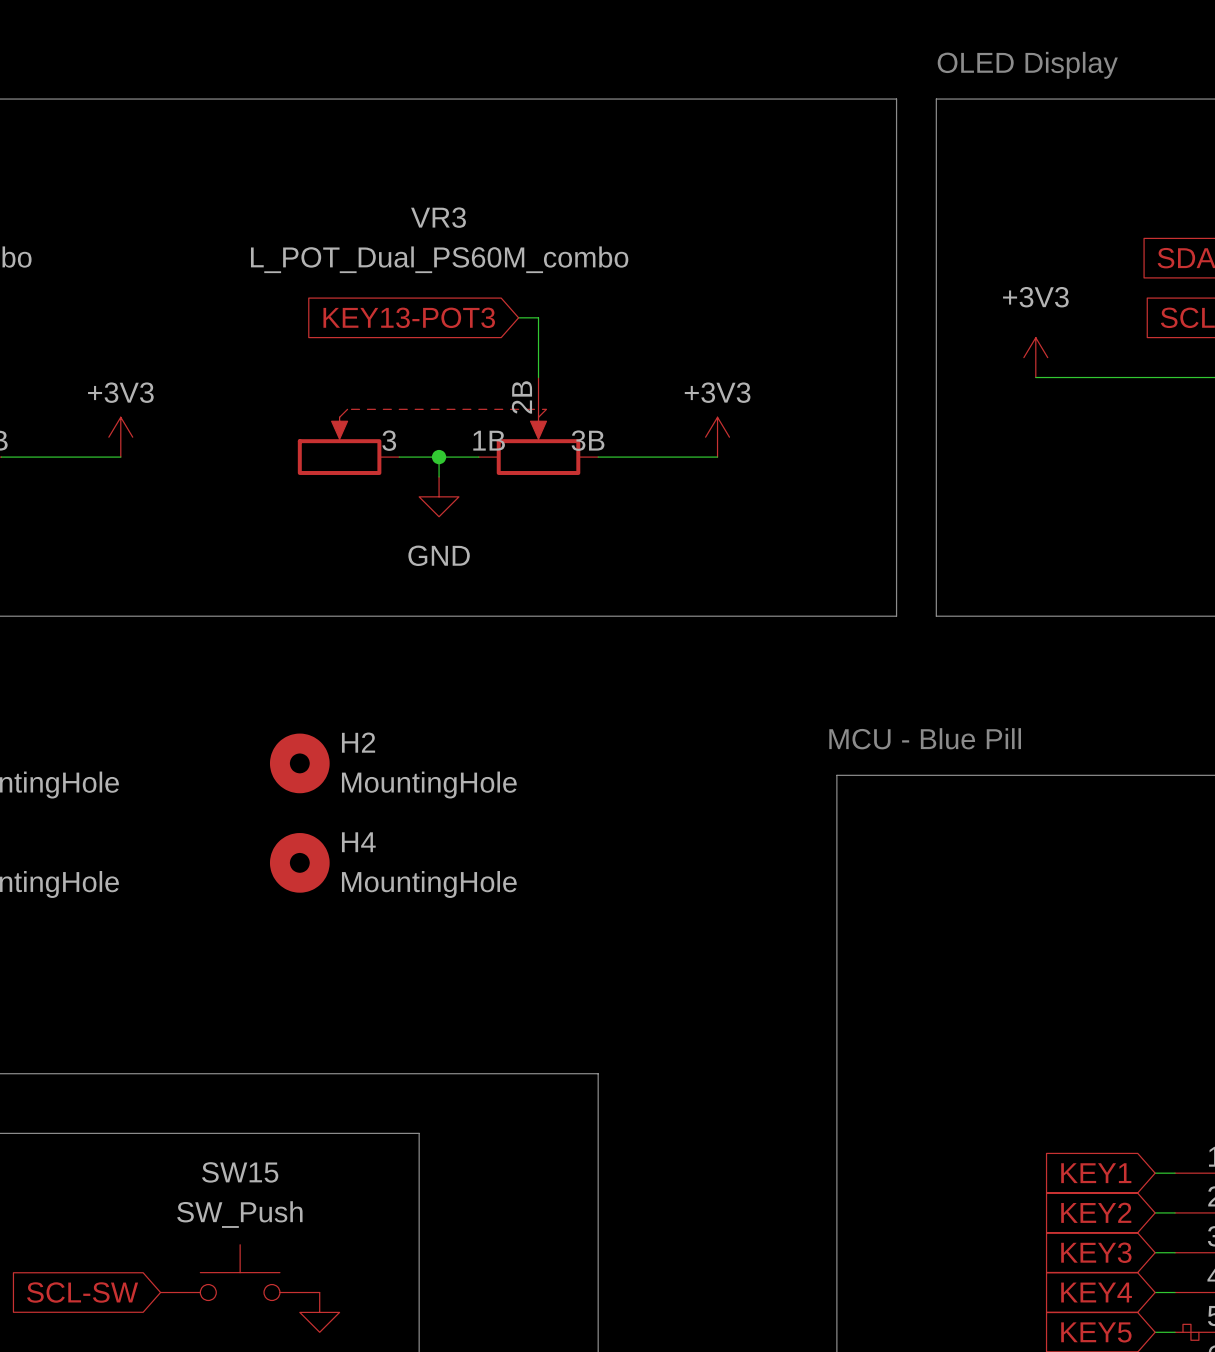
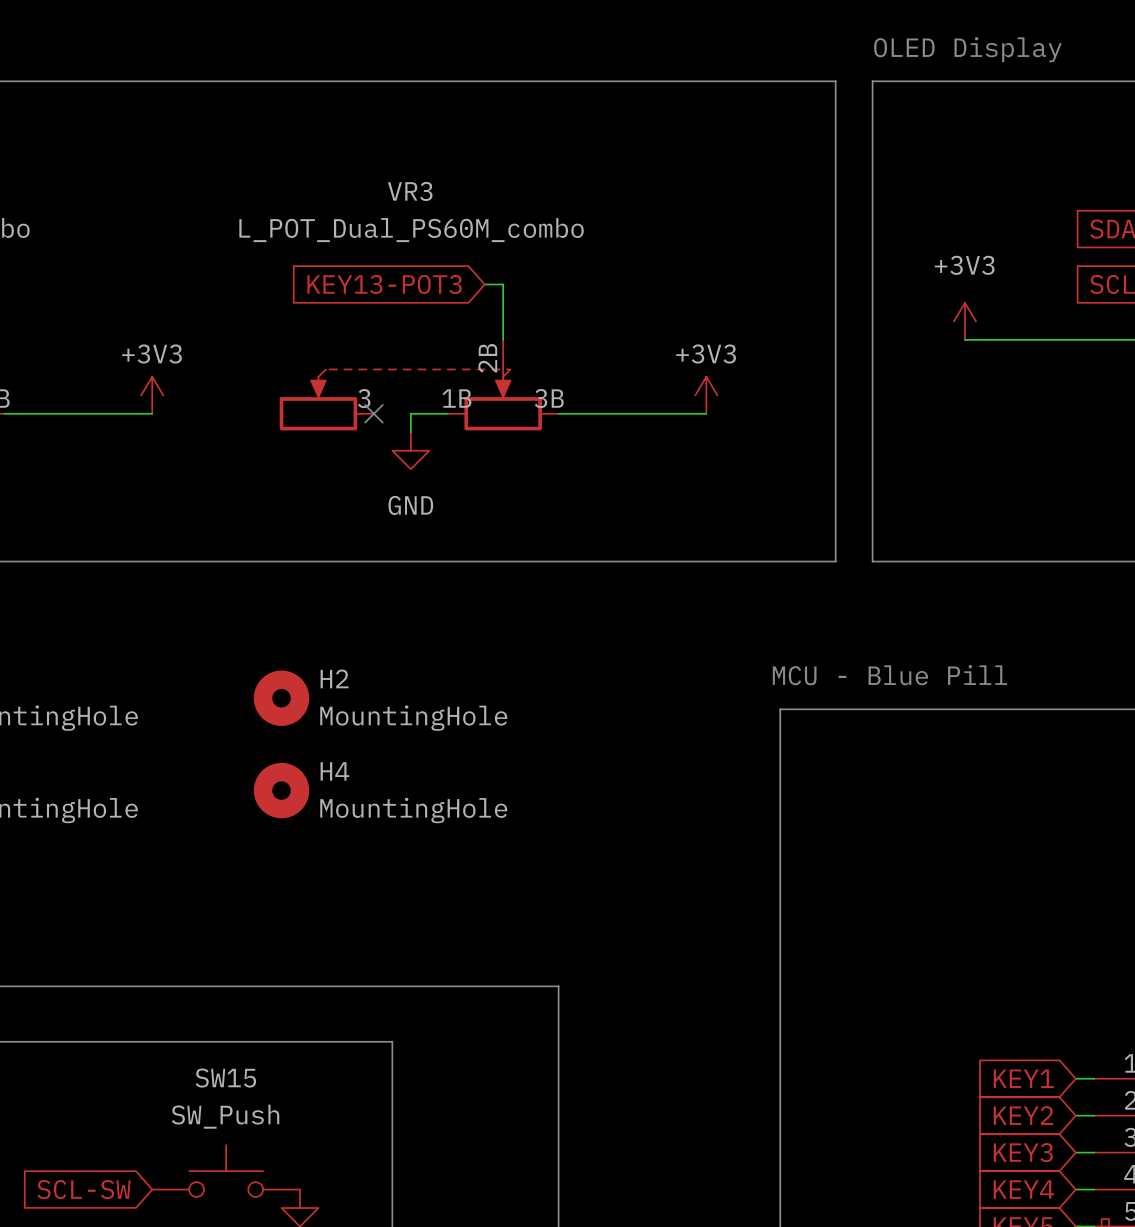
power symbol position: +3V3 (120, 437) -> +3V3 (152, 395)
power symbol position: +3V3 (717, 437) -> +3V3 (706, 395)
wire: (399, 457) (439, 457) -> (115, 413) (152, 413)
no-connect mark: none -> (373, 413)
junction: (439, 457) -> none
wire: none -> (669, 413) (706, 413)

